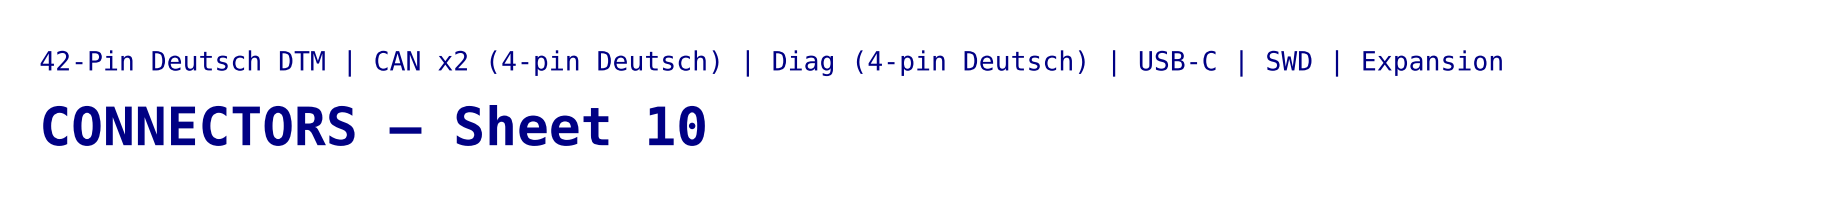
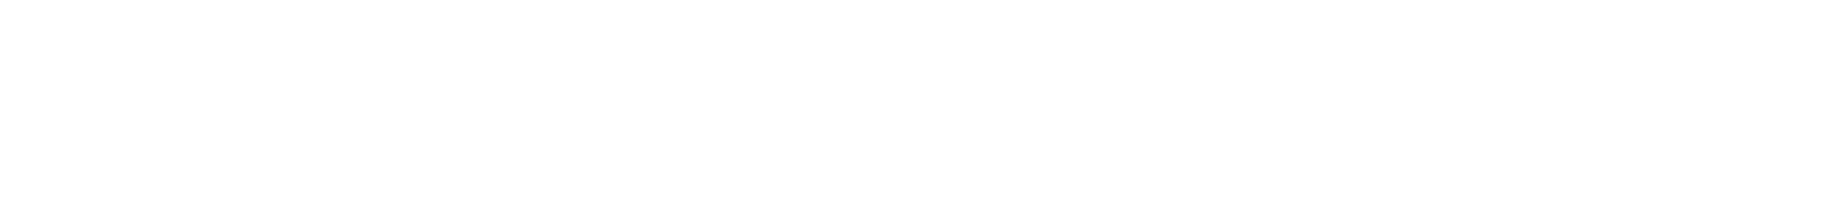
text: 42-Pin Deutsch DTM | CAN x2 (4-pin Deutsch) | Diag (4-pin Deutsch) | USB-C | SWD | Expansion (771, 63) -> none
text: CONNECTORS — Sheet 10 (374, 125) -> none

